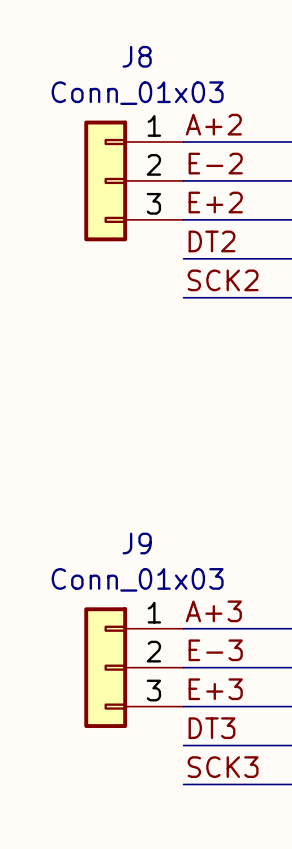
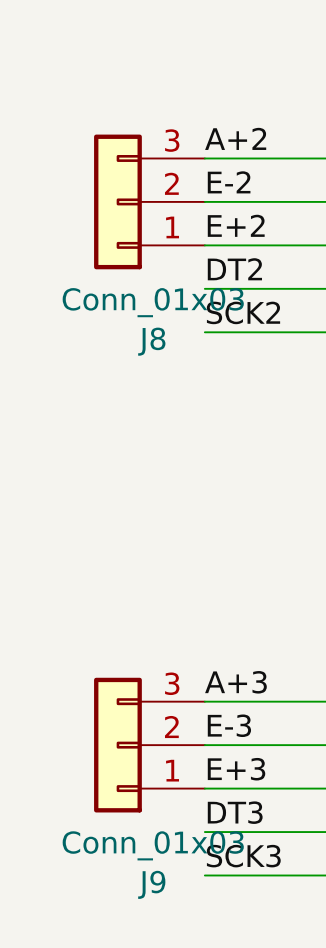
J8 flip: as is (105, 180) -> up-down (117, 201)
J9 flip: as is (105, 667) -> up-down (117, 745)

